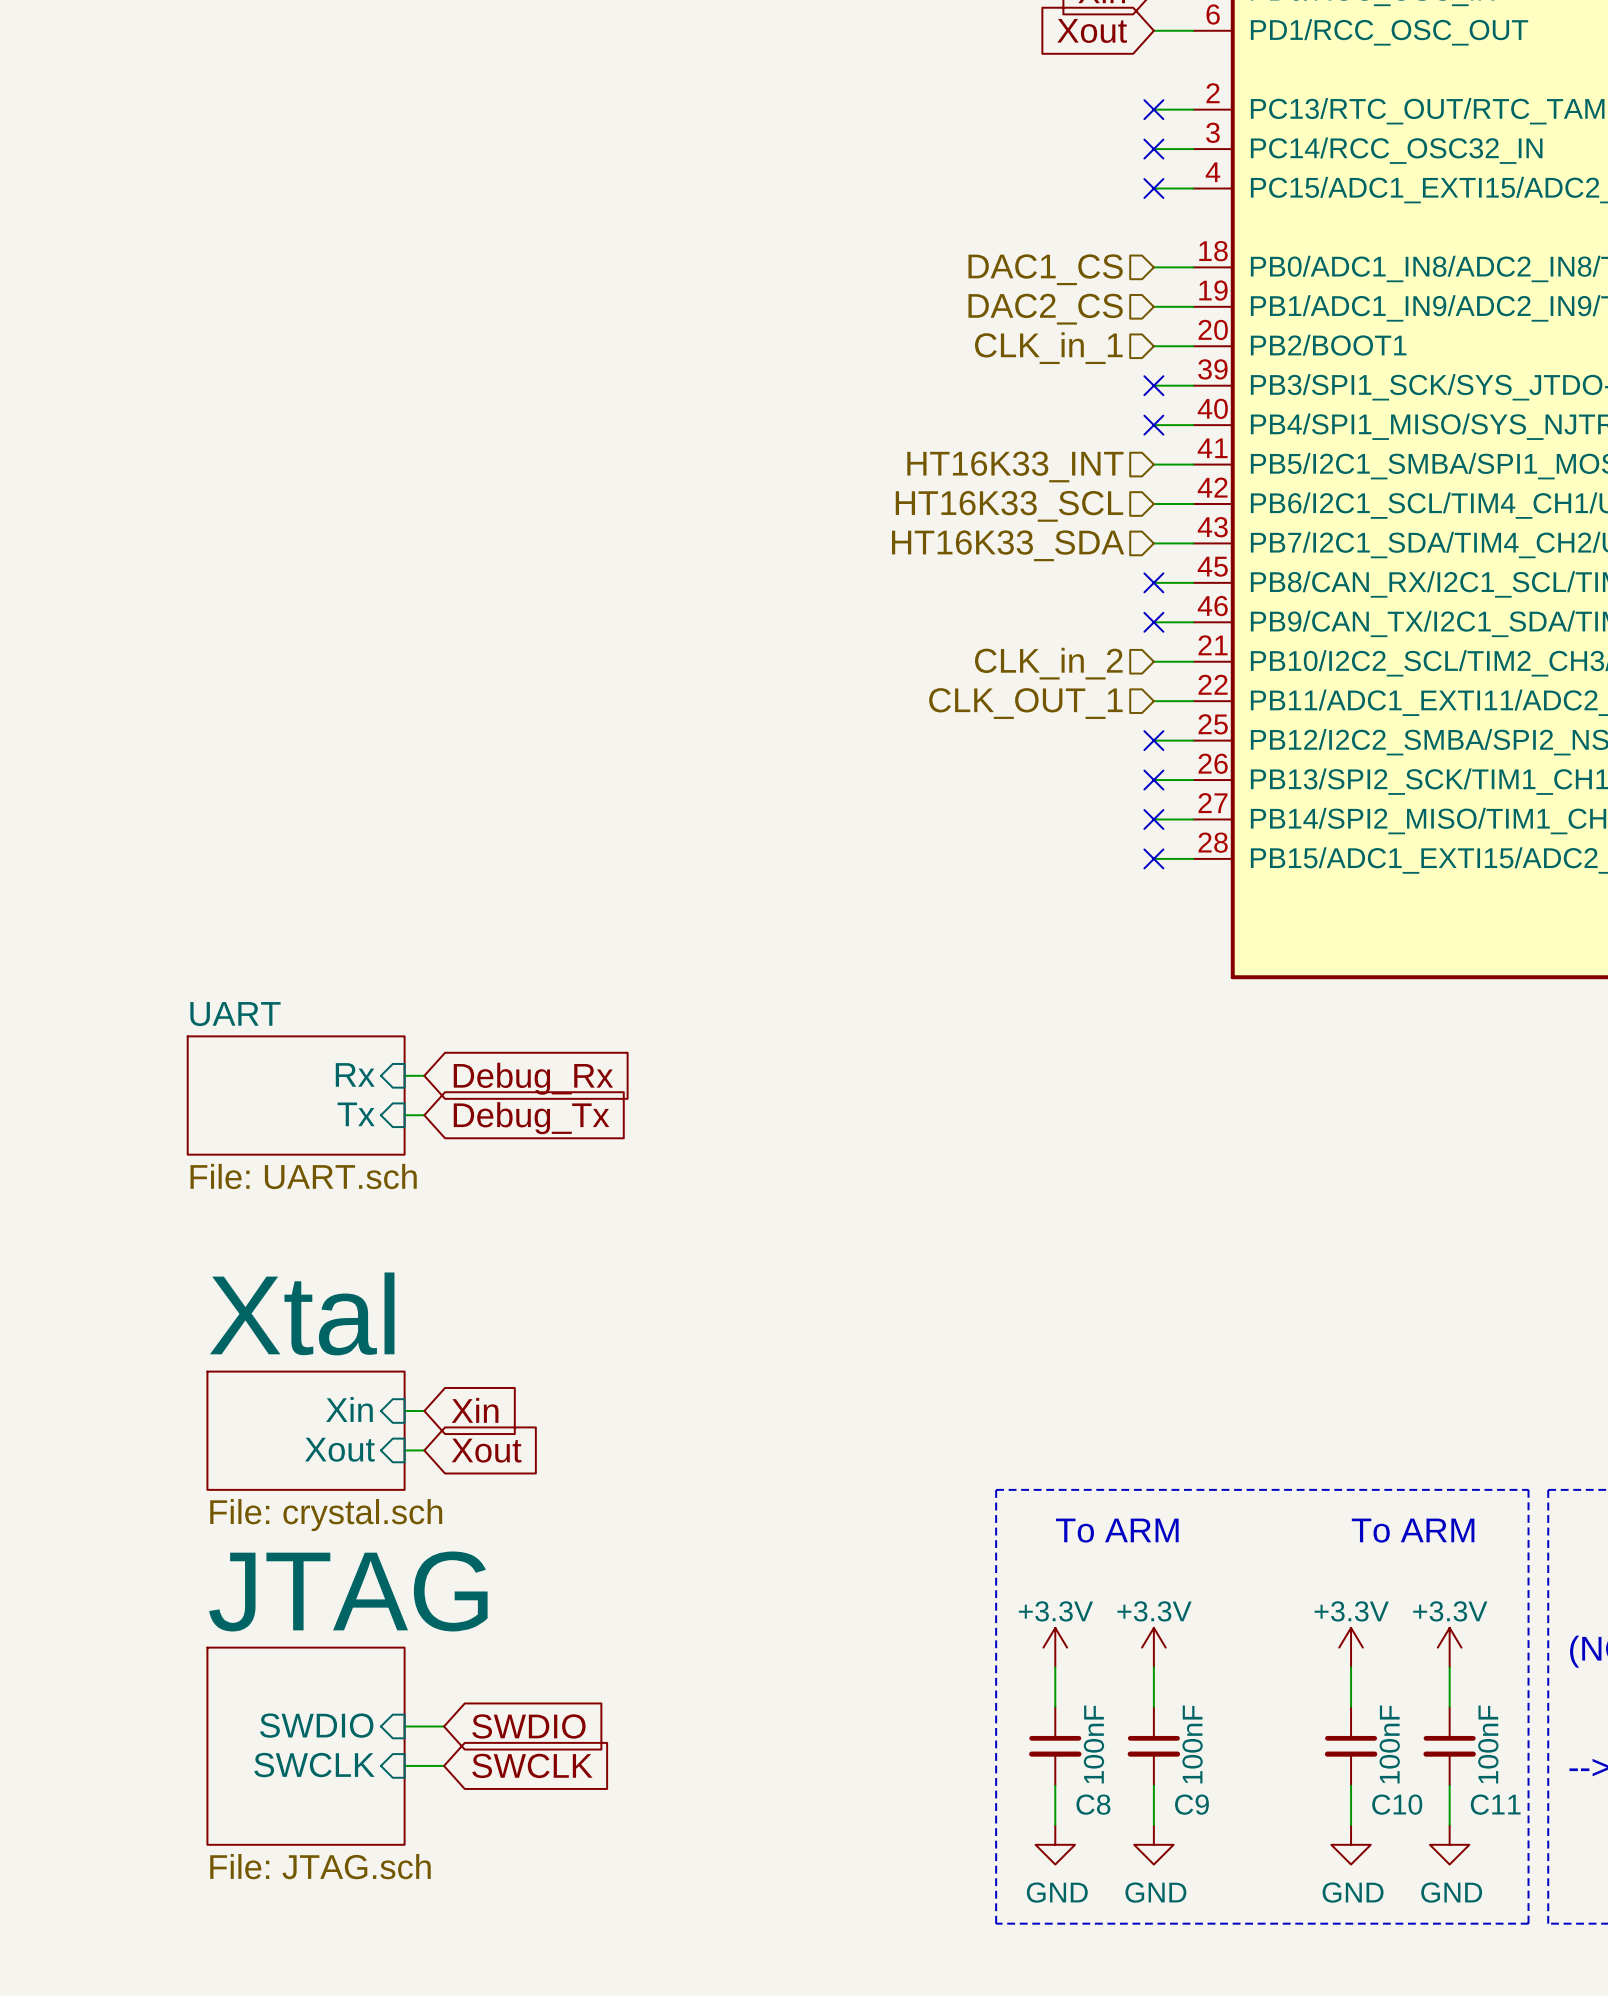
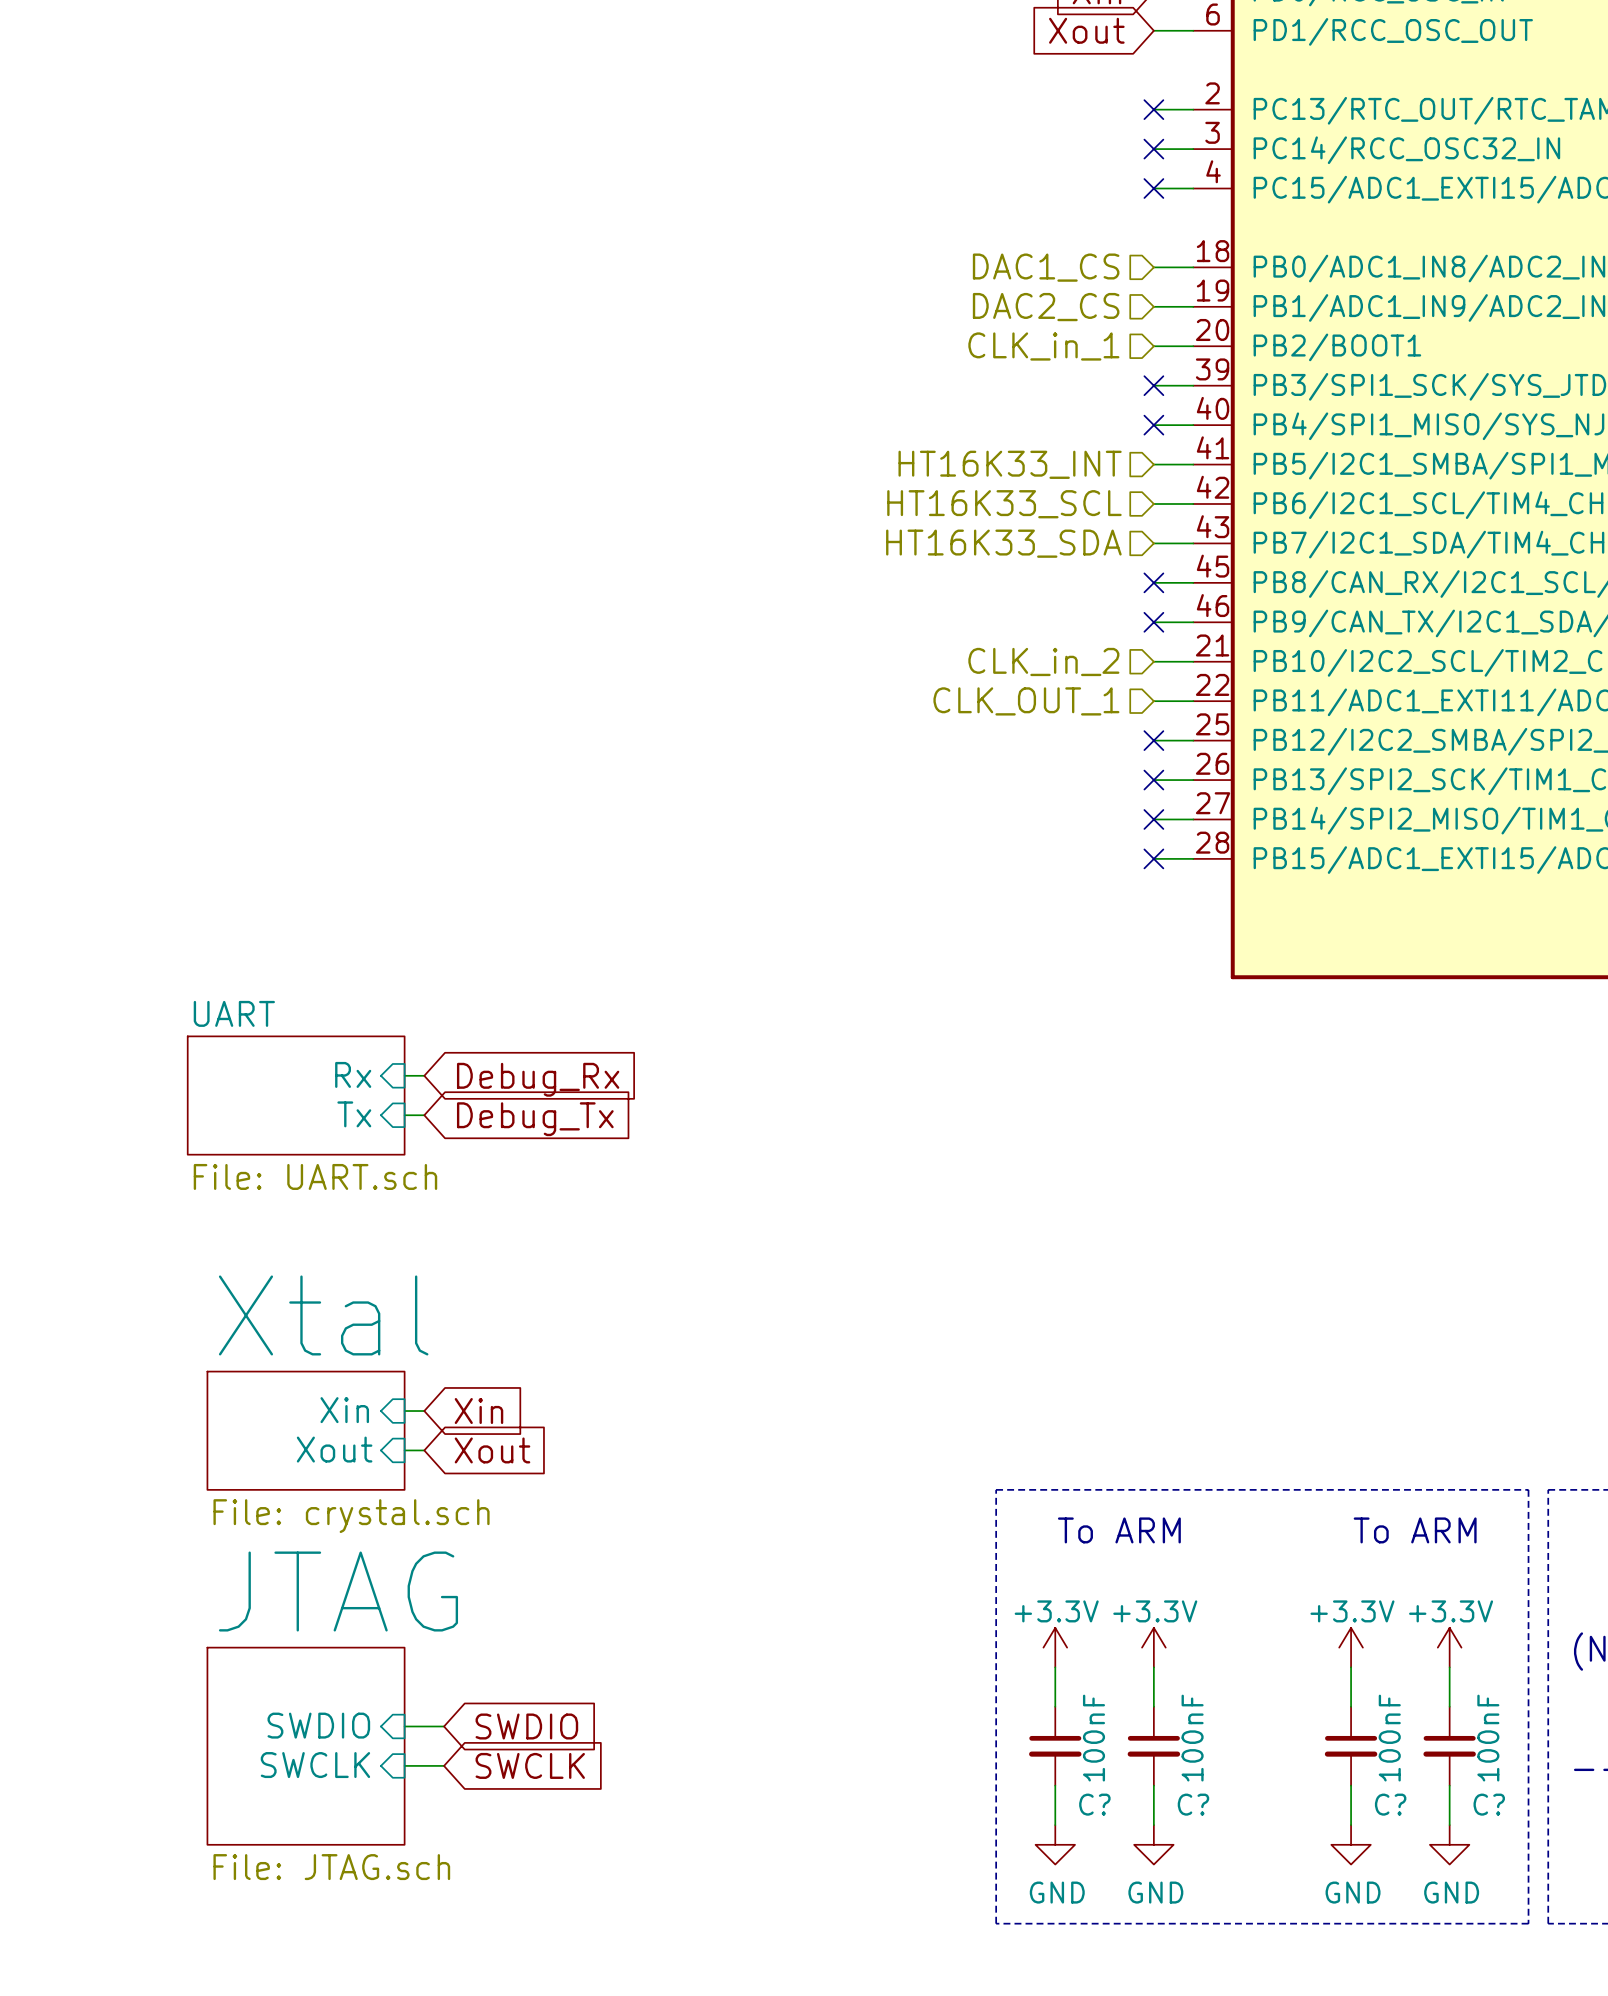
C8 name: C8 (1093, 1804) -> C? (1094, 1804)
C9 name: C9 (1191, 1804) -> C? (1193, 1804)
C10 name: C10 (1397, 1804) -> C? (1390, 1804)
C11 name: C11 (1495, 1804) -> C? (1489, 1804)

